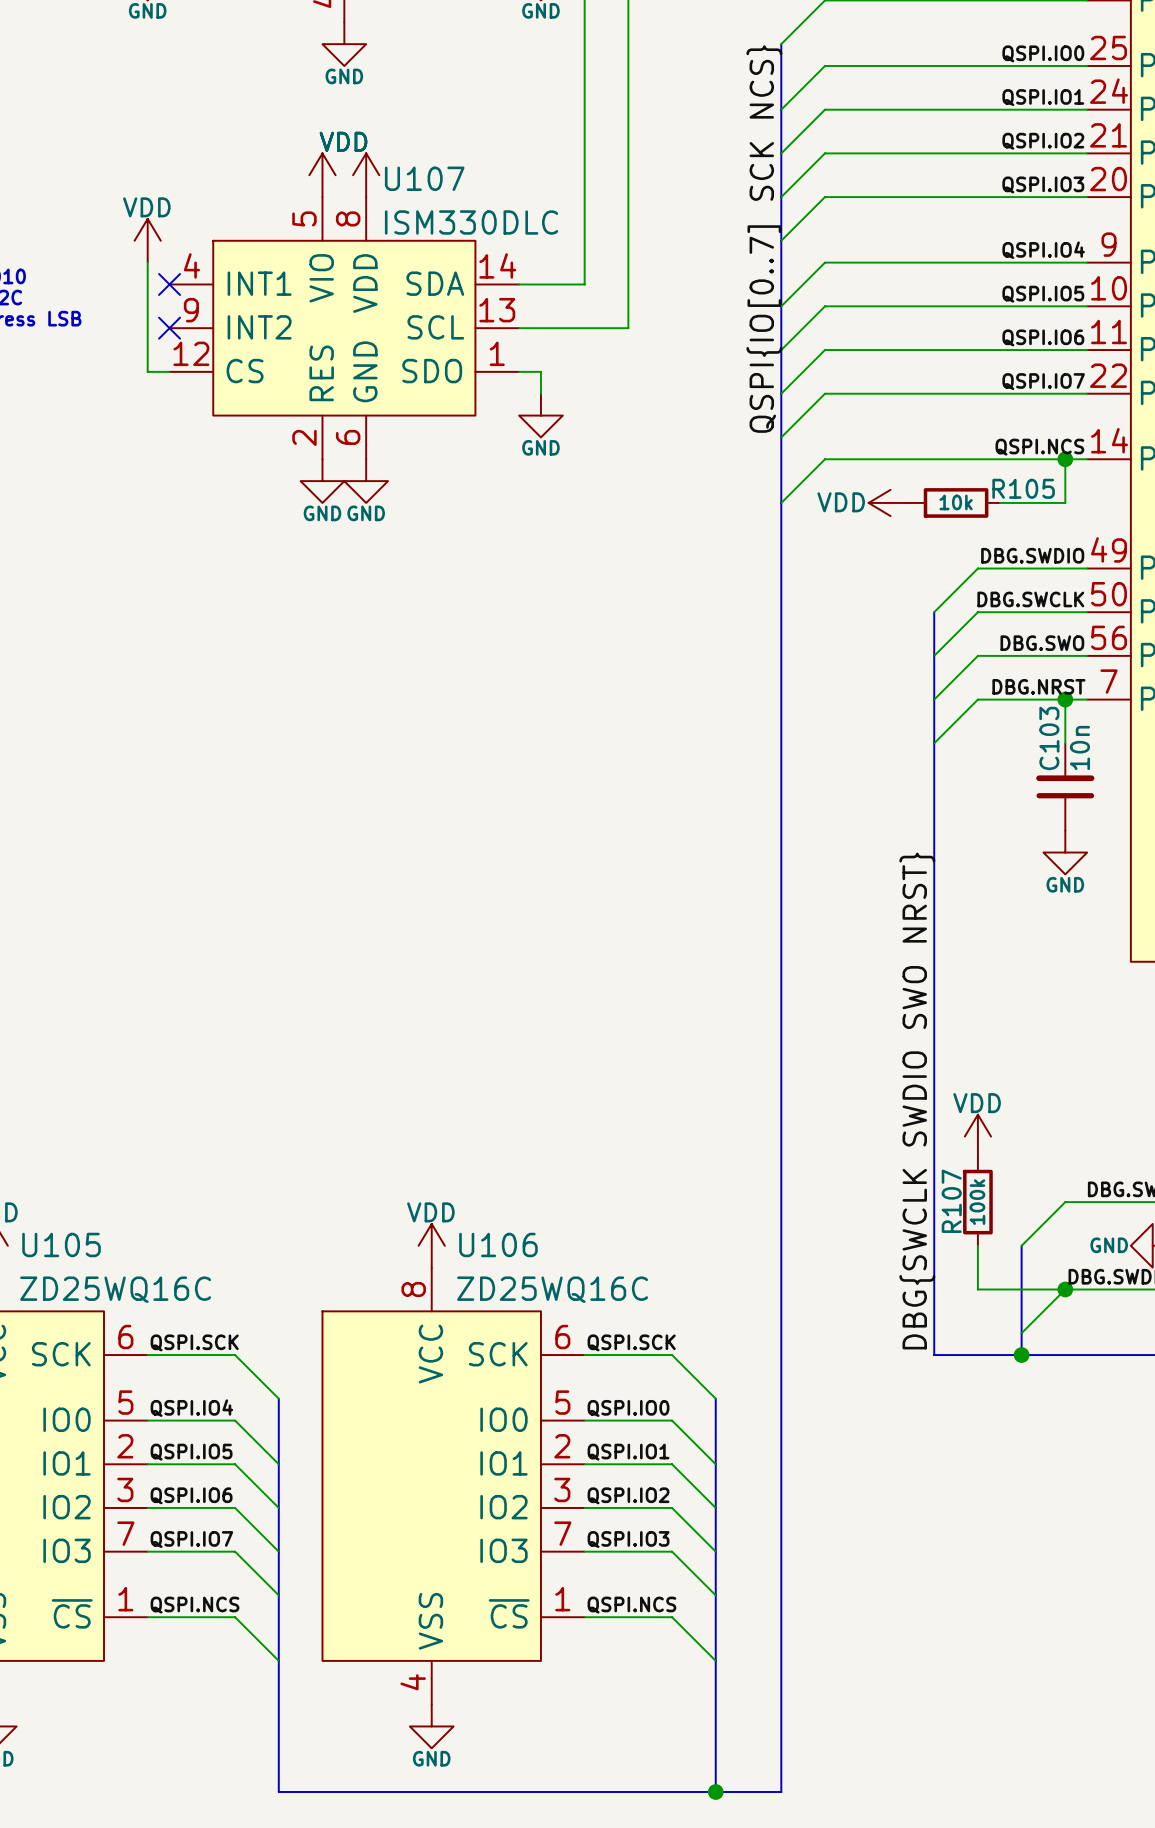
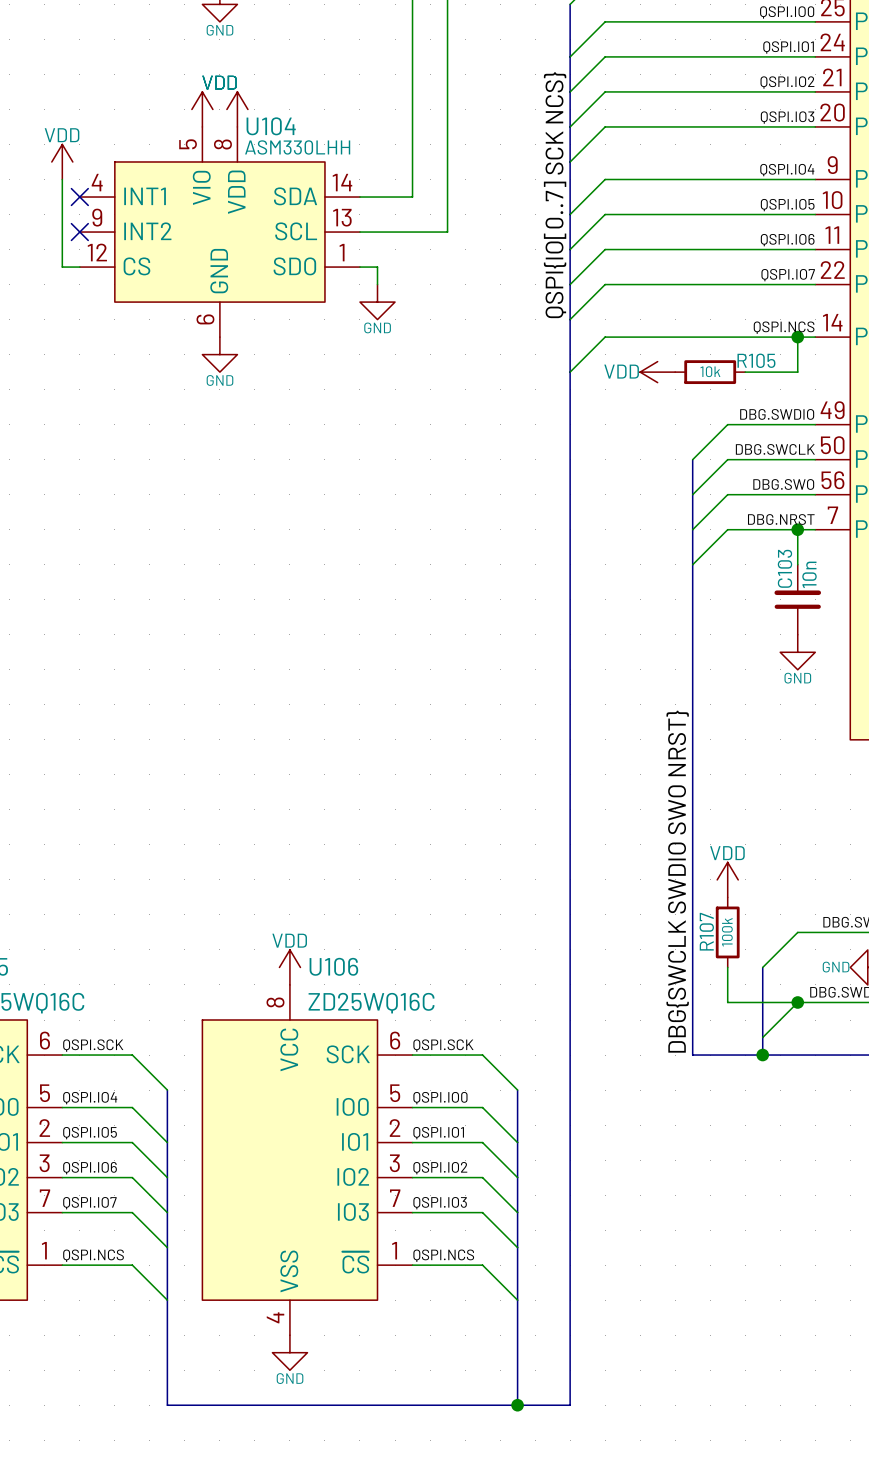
U107: ISM330DLC (344, 328) -> none
U104: none -> ASM330LHH (219, 232)
power symbol: GND (322, 481) -> none
power symbol: none -> GND (219, 354)
power symbol: GND (366, 481) -> none

